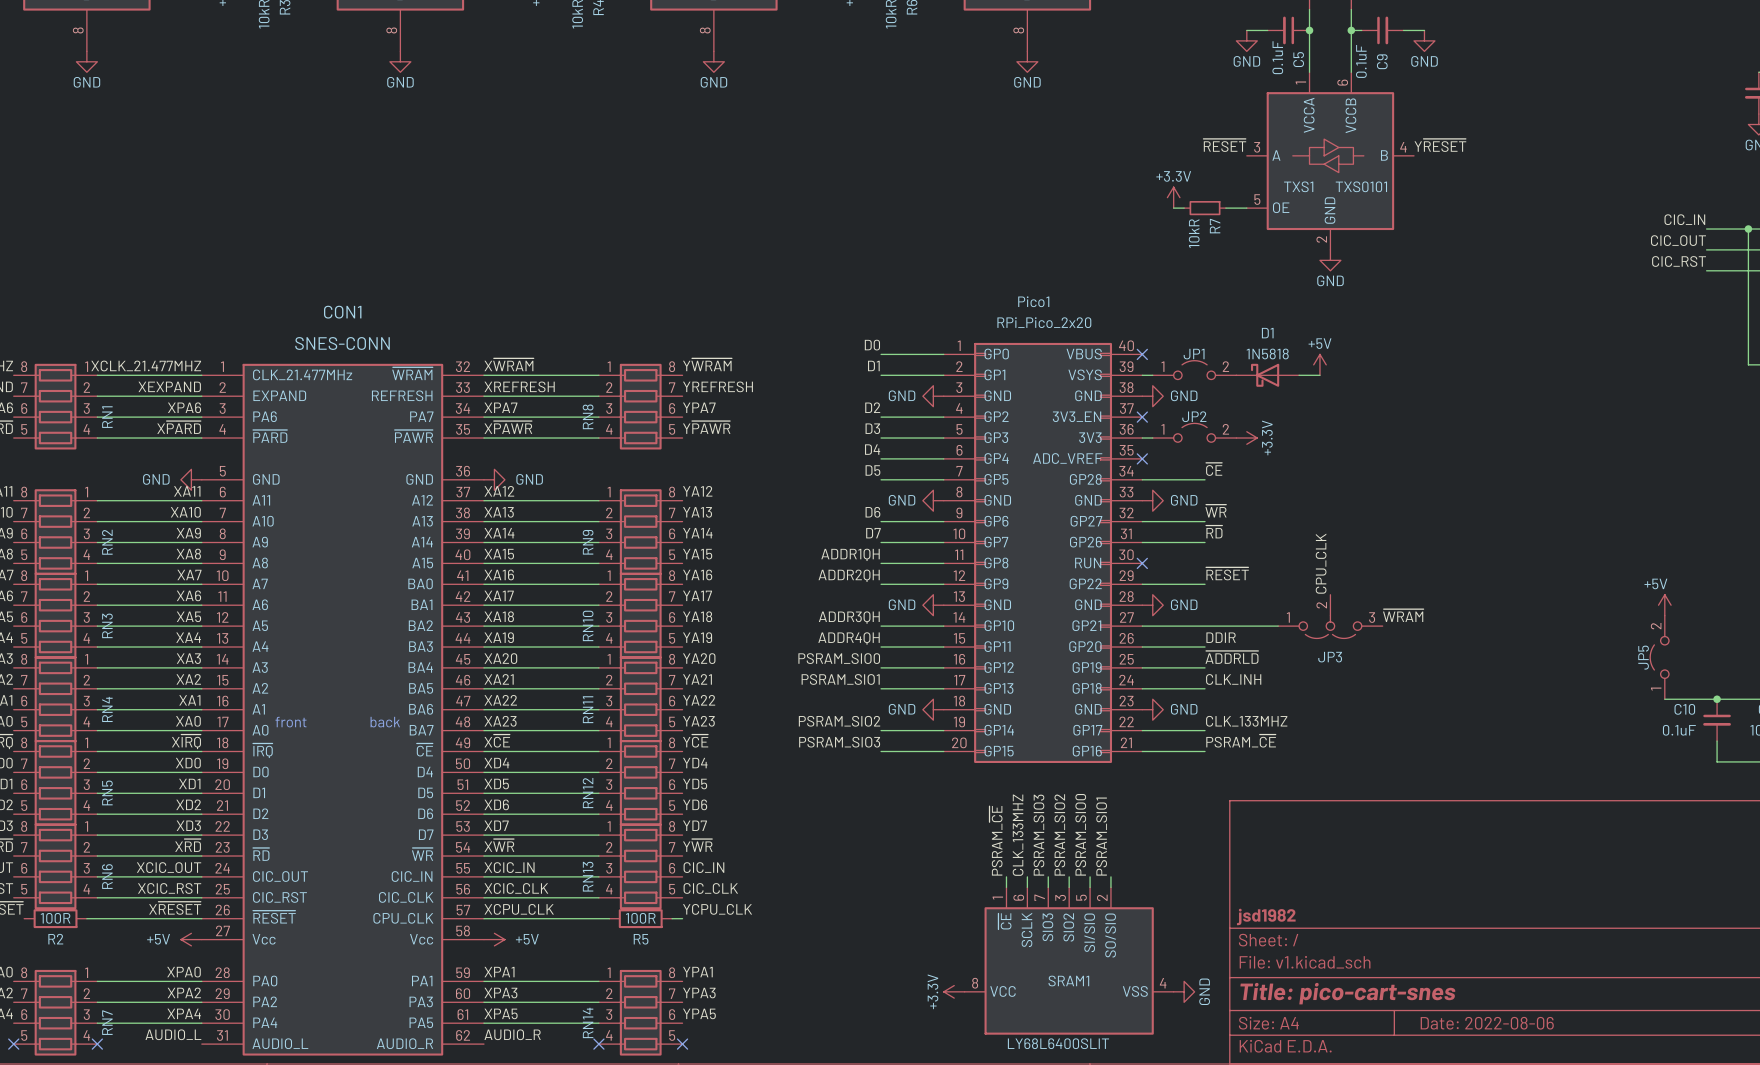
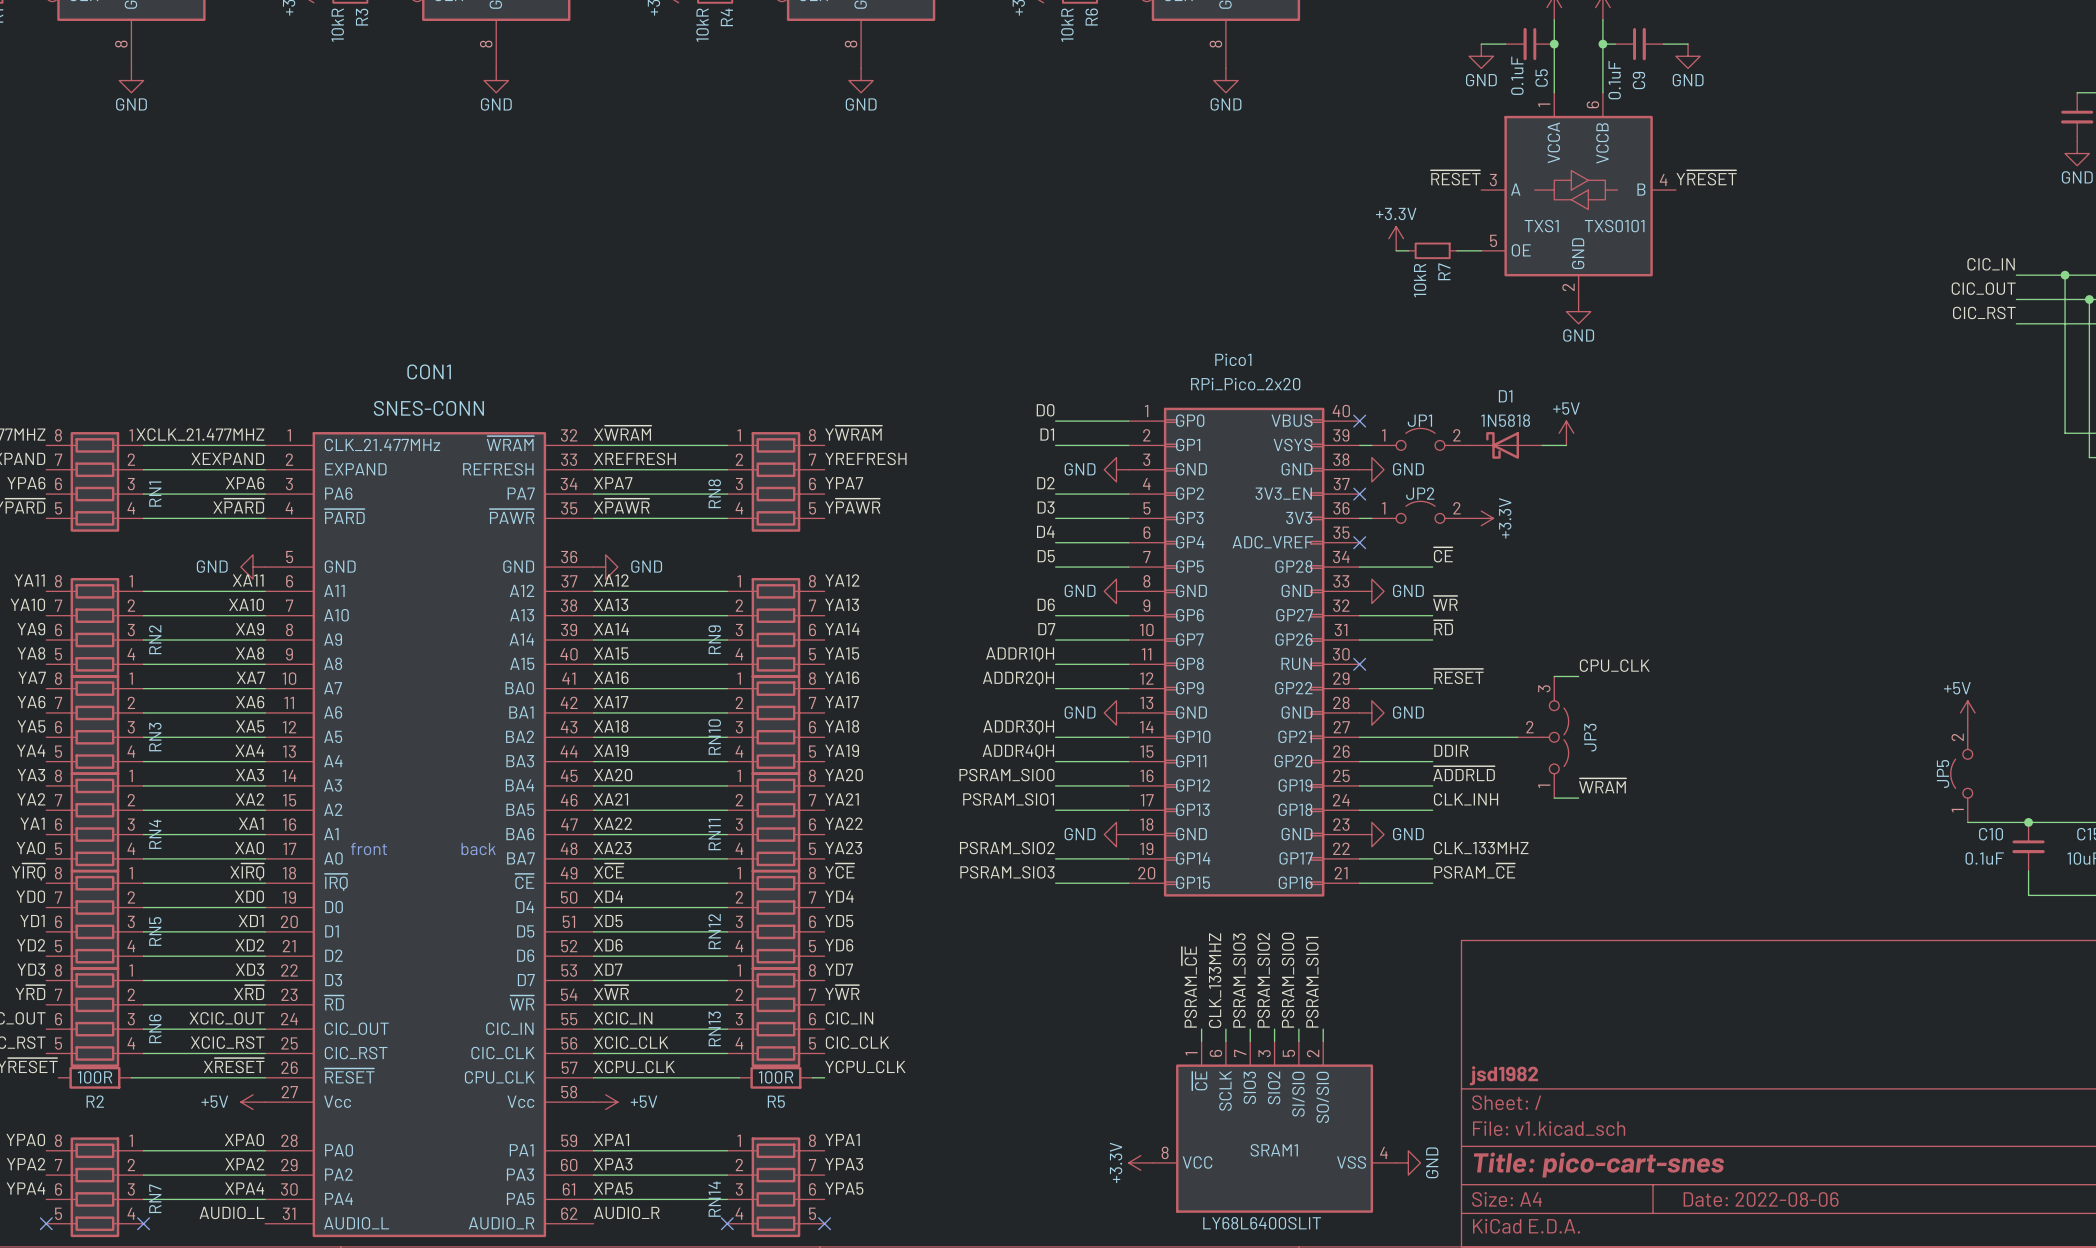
label rotation: 0° (1321, 563) -> 90° clockwise (1614, 665)
wire: none -> (1554, 676) (1578, 676)
label position: ~{WRAM} (1403, 615) -> ~{WRAM} (1602, 785)
JP3 rotation: 0° (1330, 627) -> 90° counterclockwise (1555, 737)
wire: none -> (1554, 798) (1578, 798)

